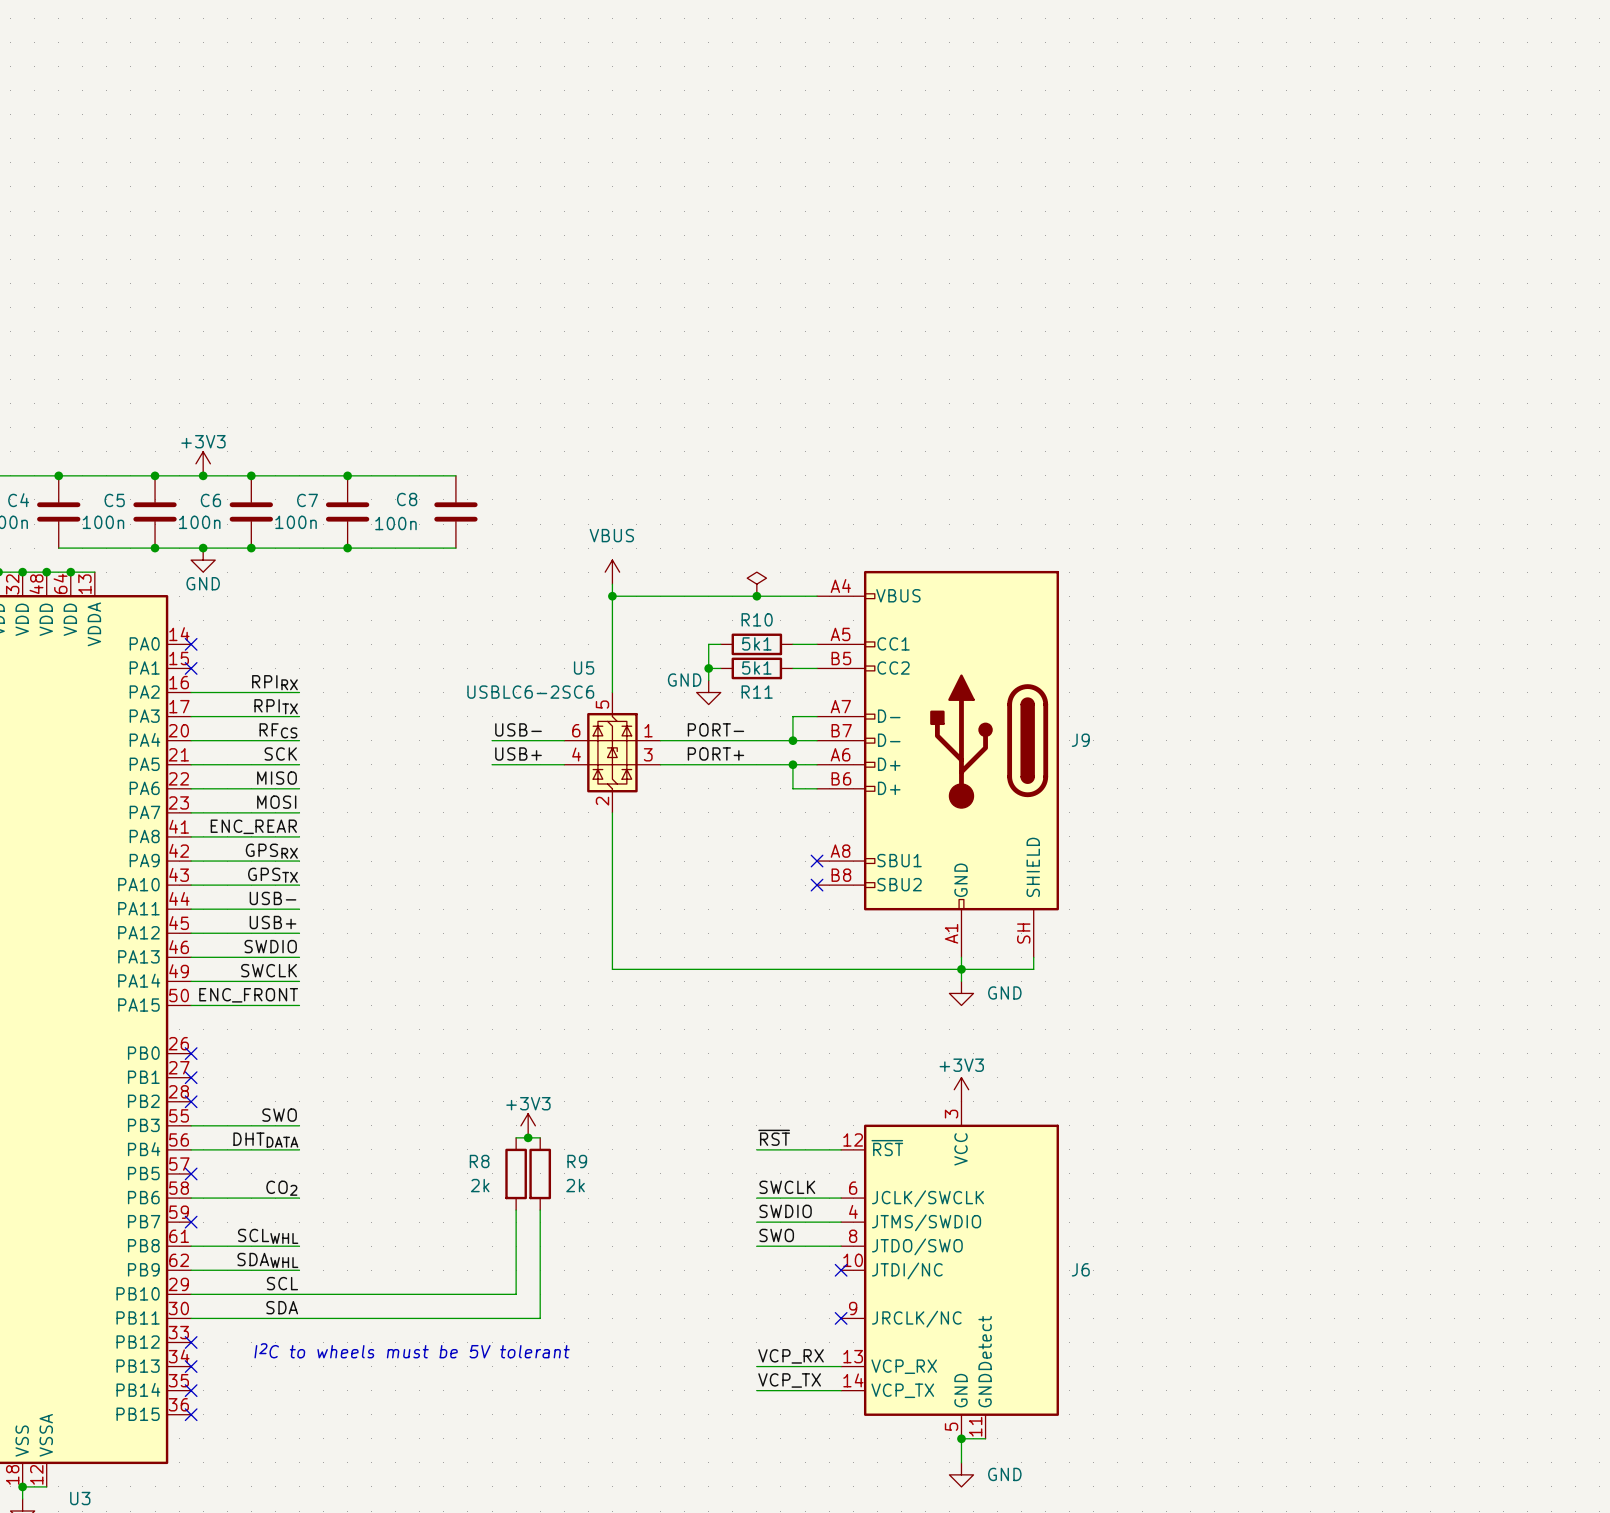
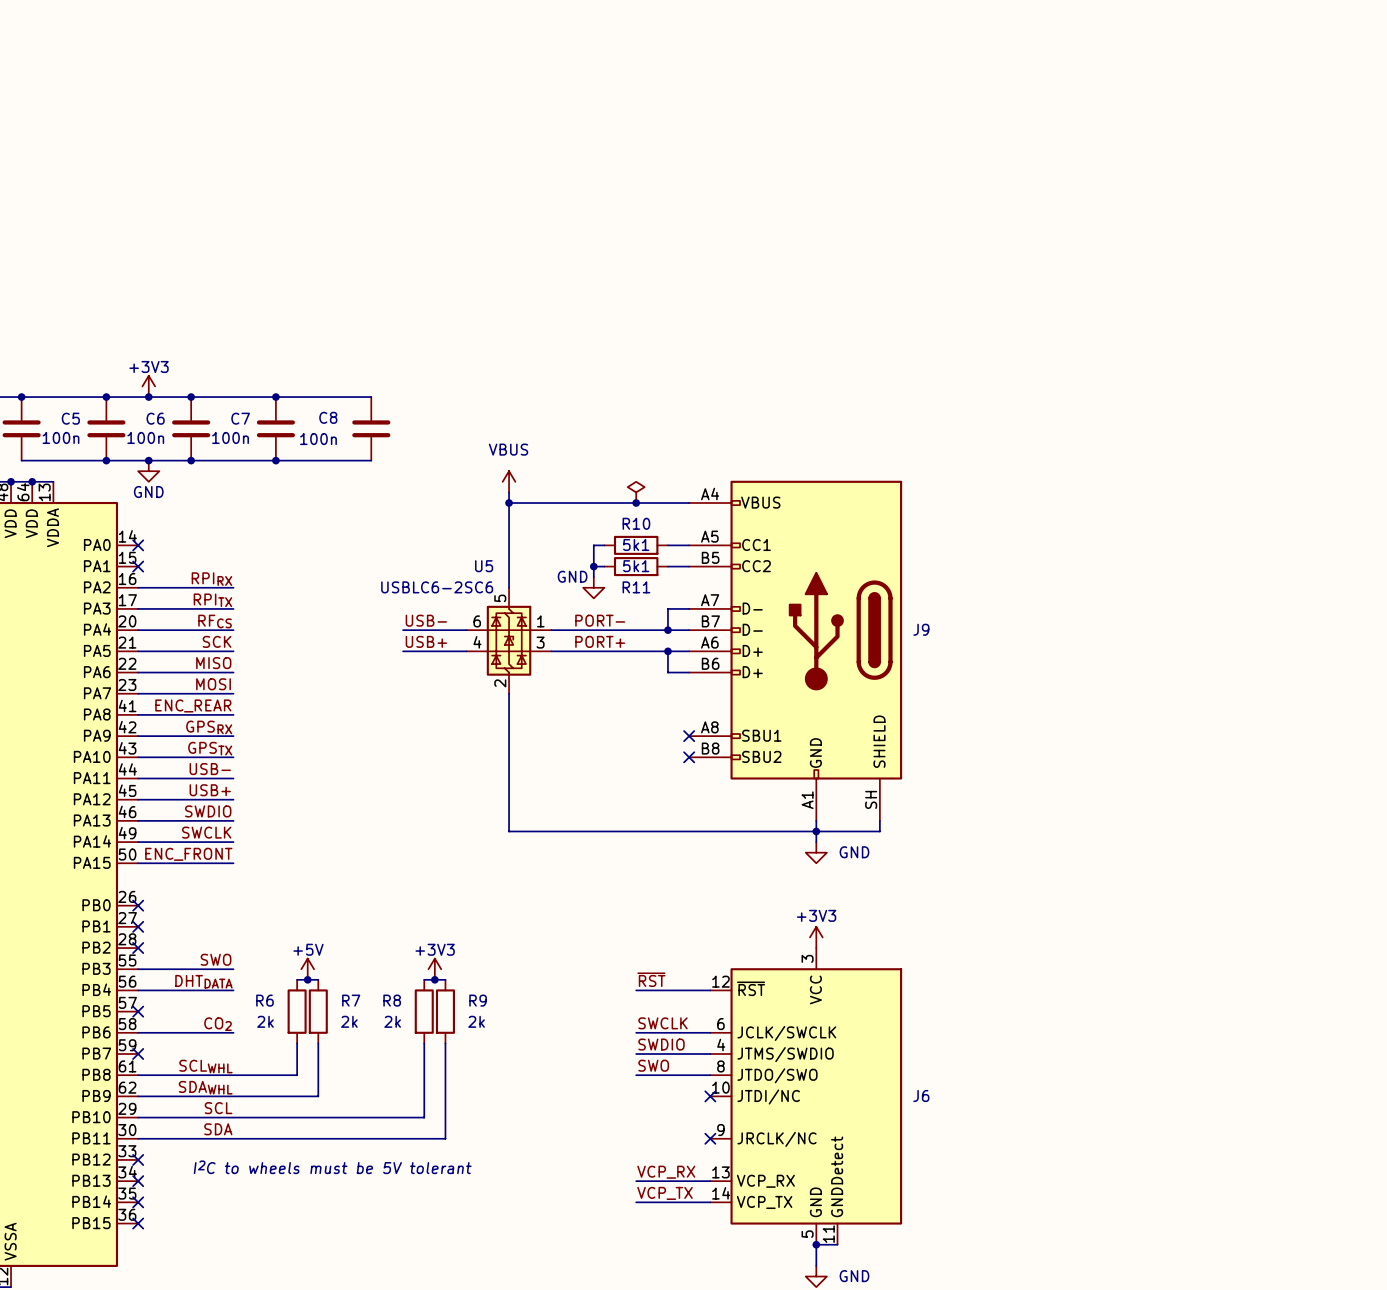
power symbol: none -> +5V (307, 969)
wire: none -> (297, 979) (318, 979)
junction: none -> (307, 979)
R6: none -> 2k (297, 1011)
R7: none -> 2k (318, 1011)
wire: none -> (297, 1043) (297, 1075) (233, 1075)
wire: none -> (318, 1043) (318, 1096) (233, 1096)

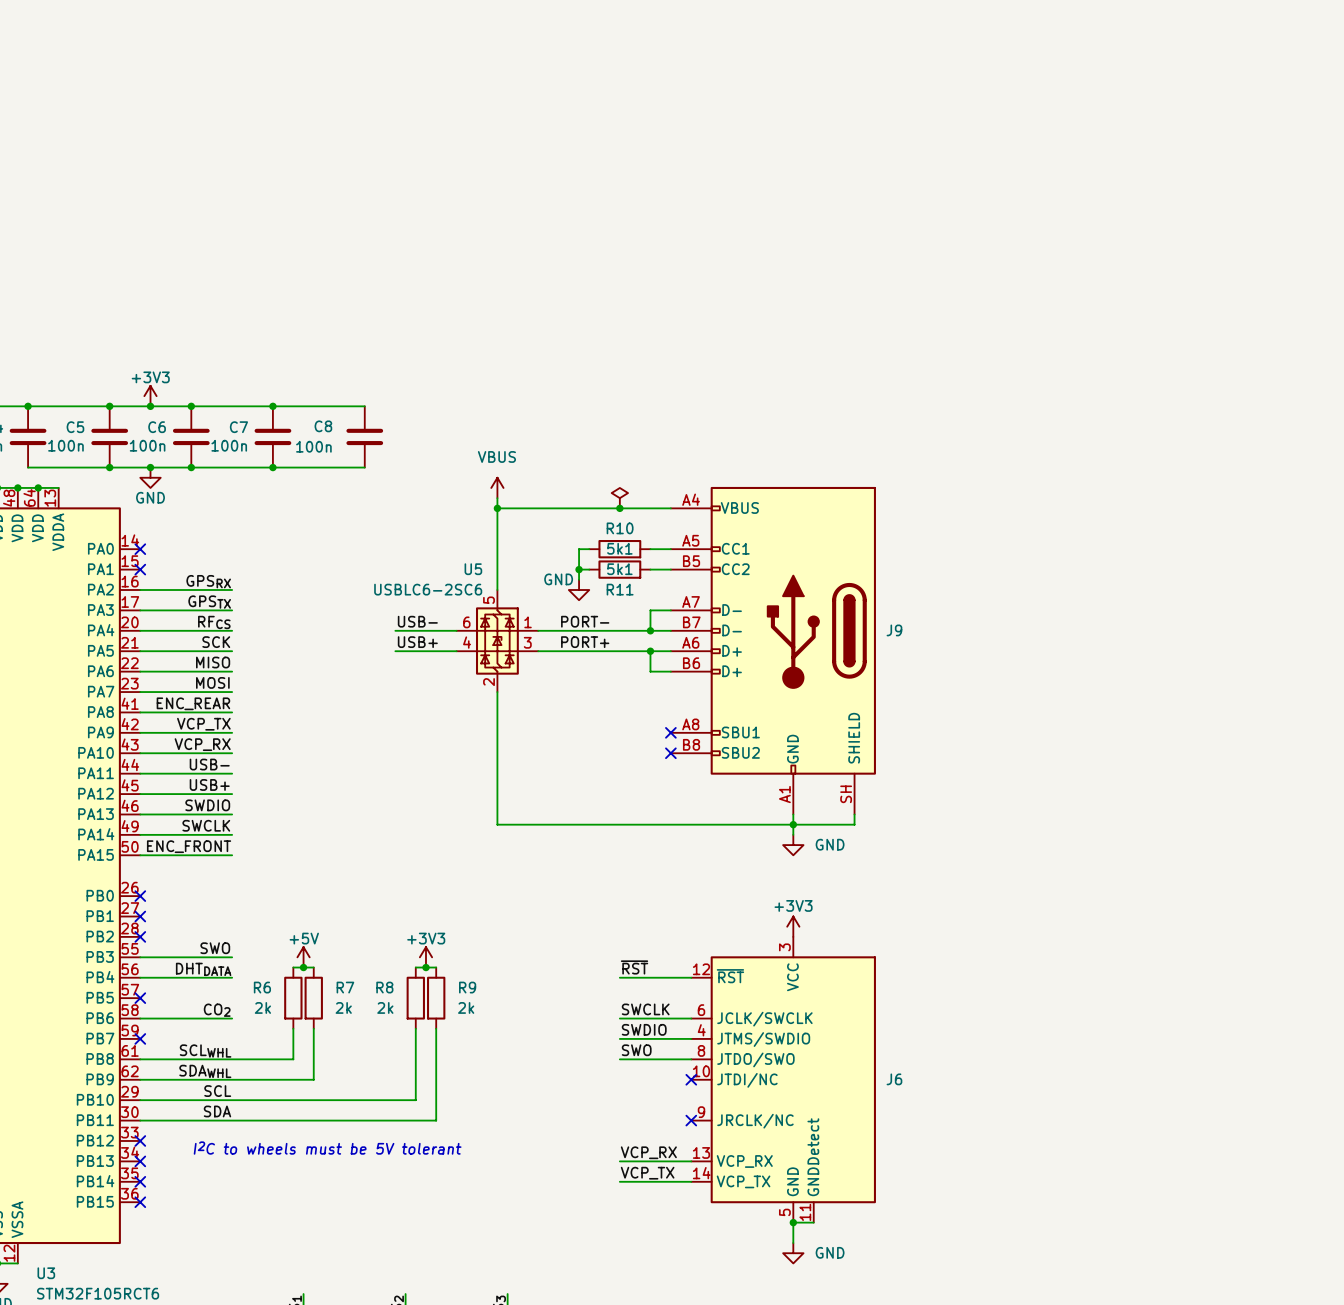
label: RPIRX (211, 579) -> GPSRX (208, 581)
label: RPITX (212, 600) -> GPSTX (209, 602)
label: GPSRX (209, 727) -> VCP_TX (203, 724)
label: GPSTX (210, 748) -> VCP_RX (202, 744)

